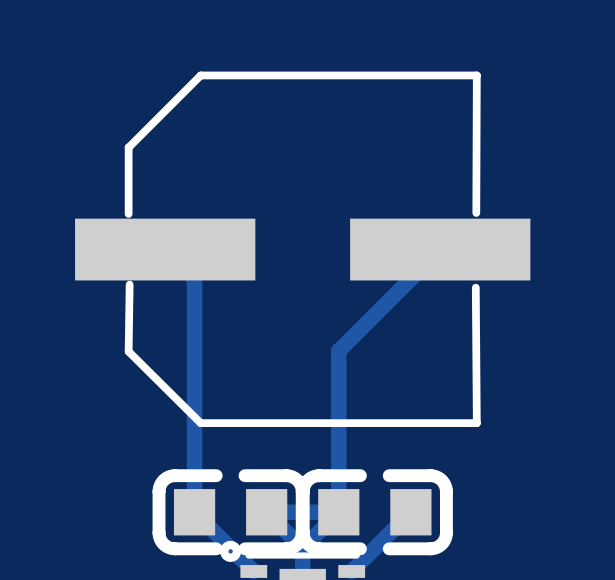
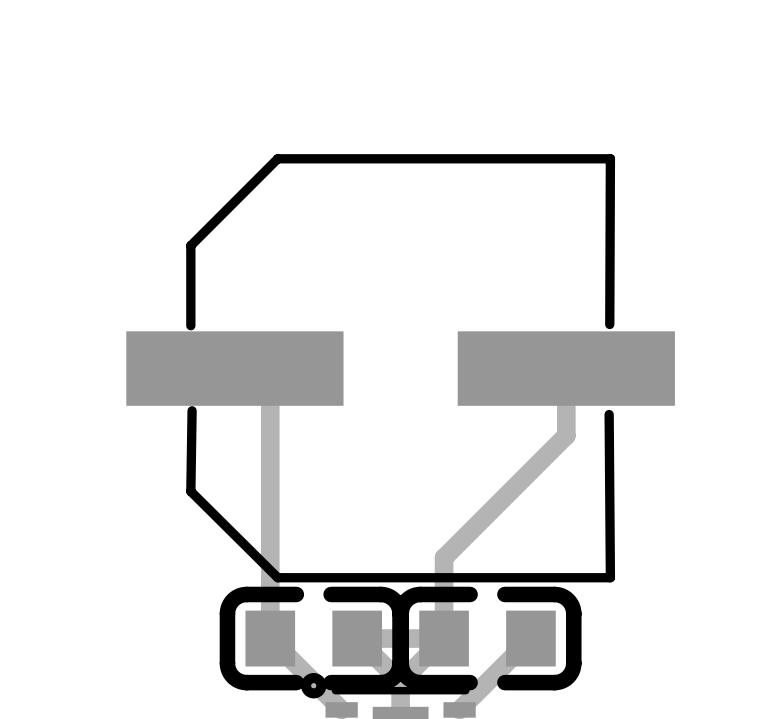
part position: (302, 249) -> (400, 368)
track: (440, 249) (338, 351) (338, 445) -> (566, 368) (566, 435) (444, 557)

